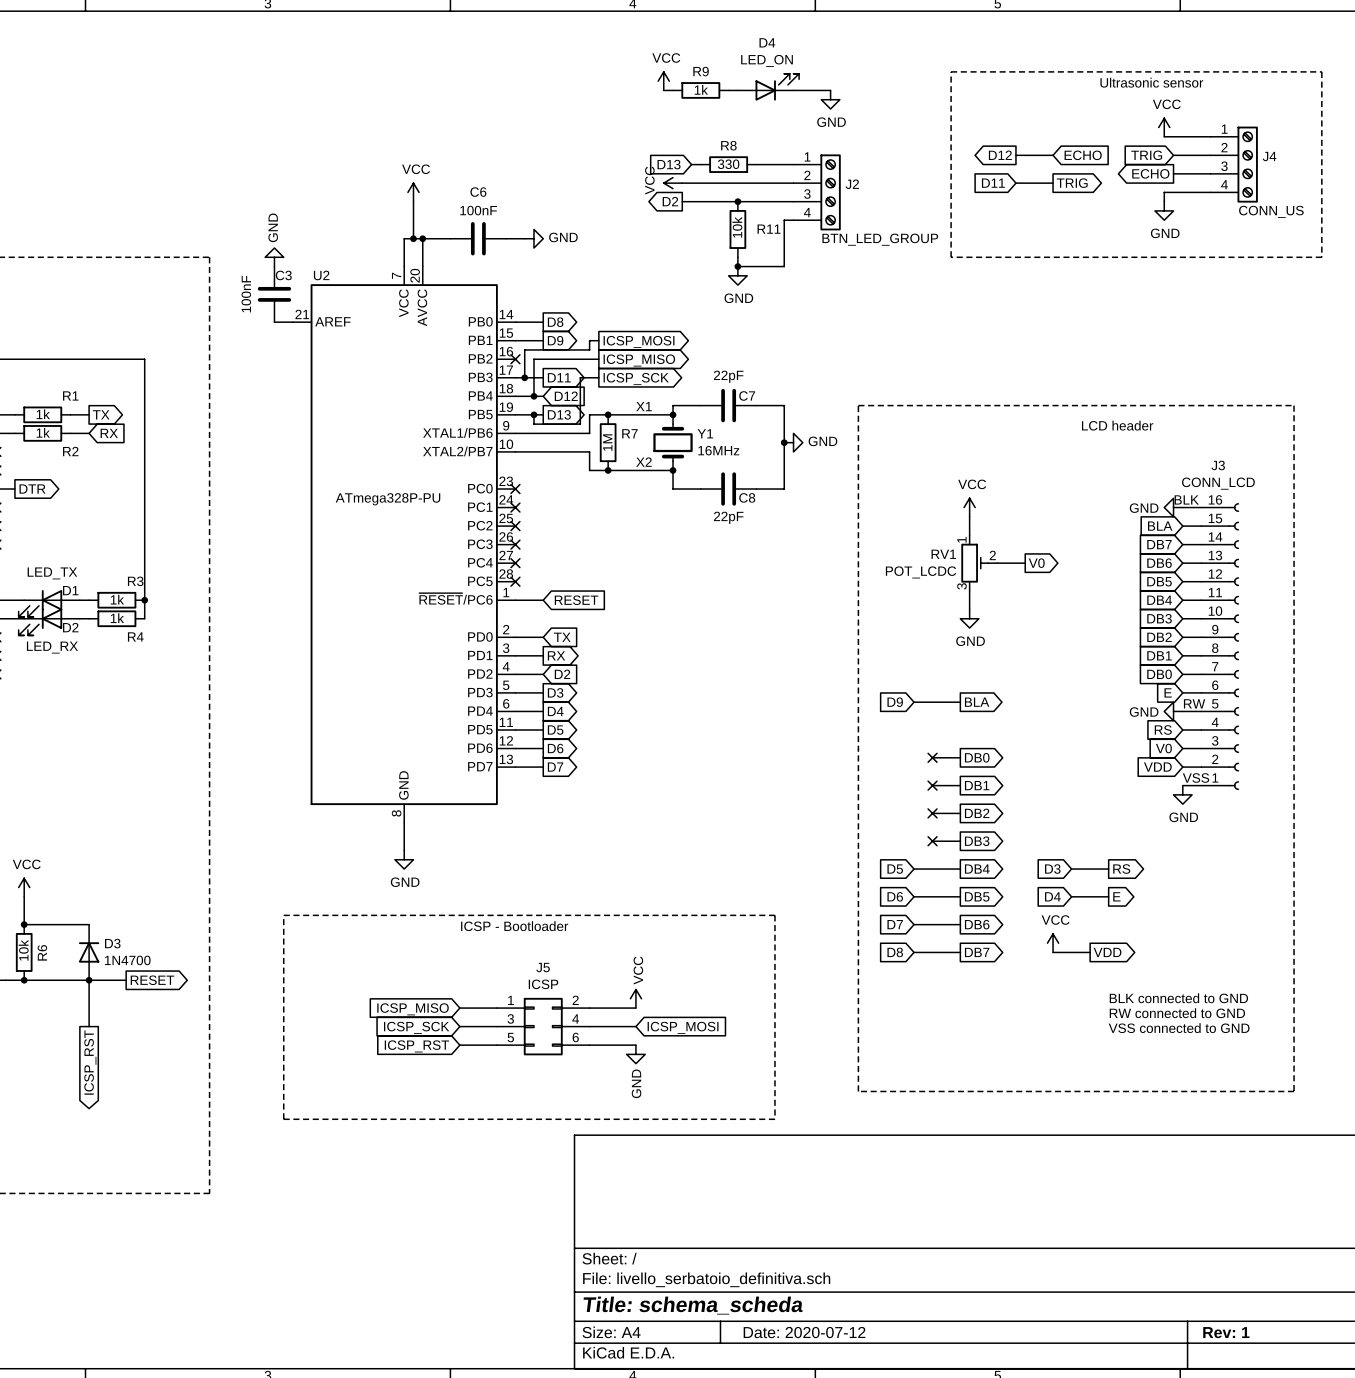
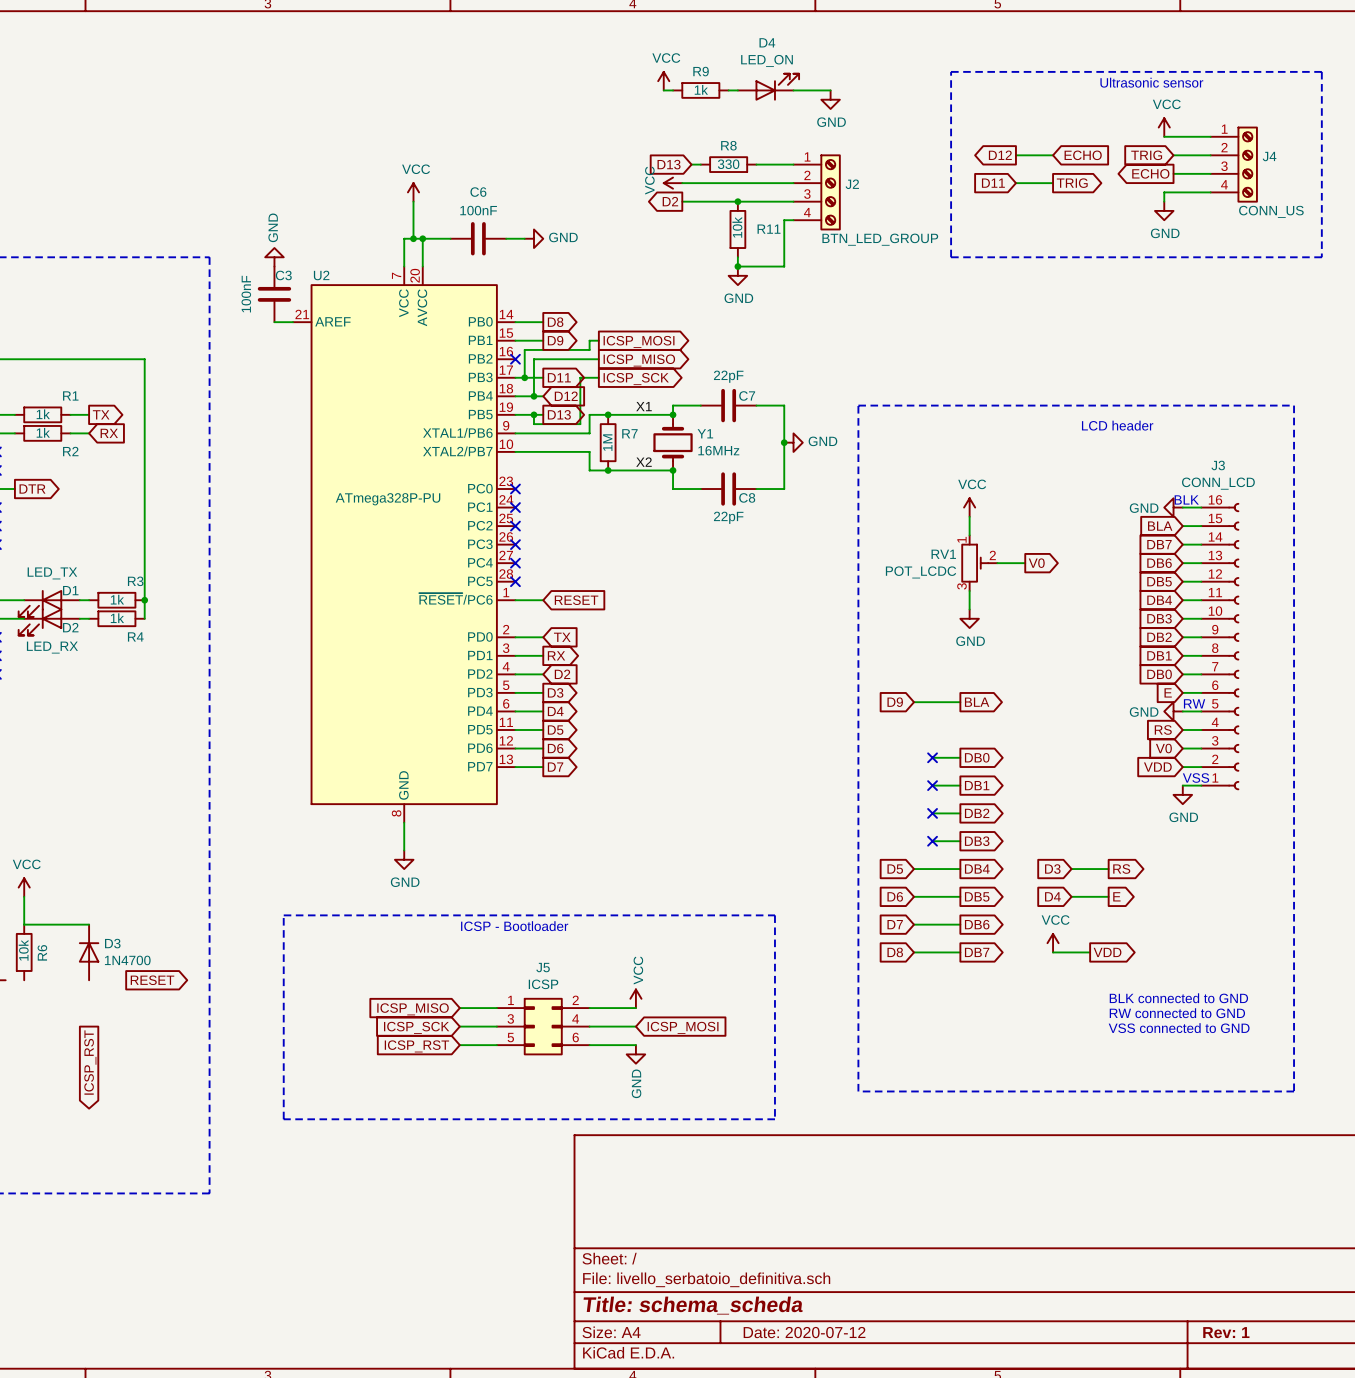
junction: (24, 924) -> none
wire: (5, 980) (126, 980) -> none
junction: (24, 980) -> none
wire: (89, 980) (89, 1026) -> none
junction: (89, 980) -> none

